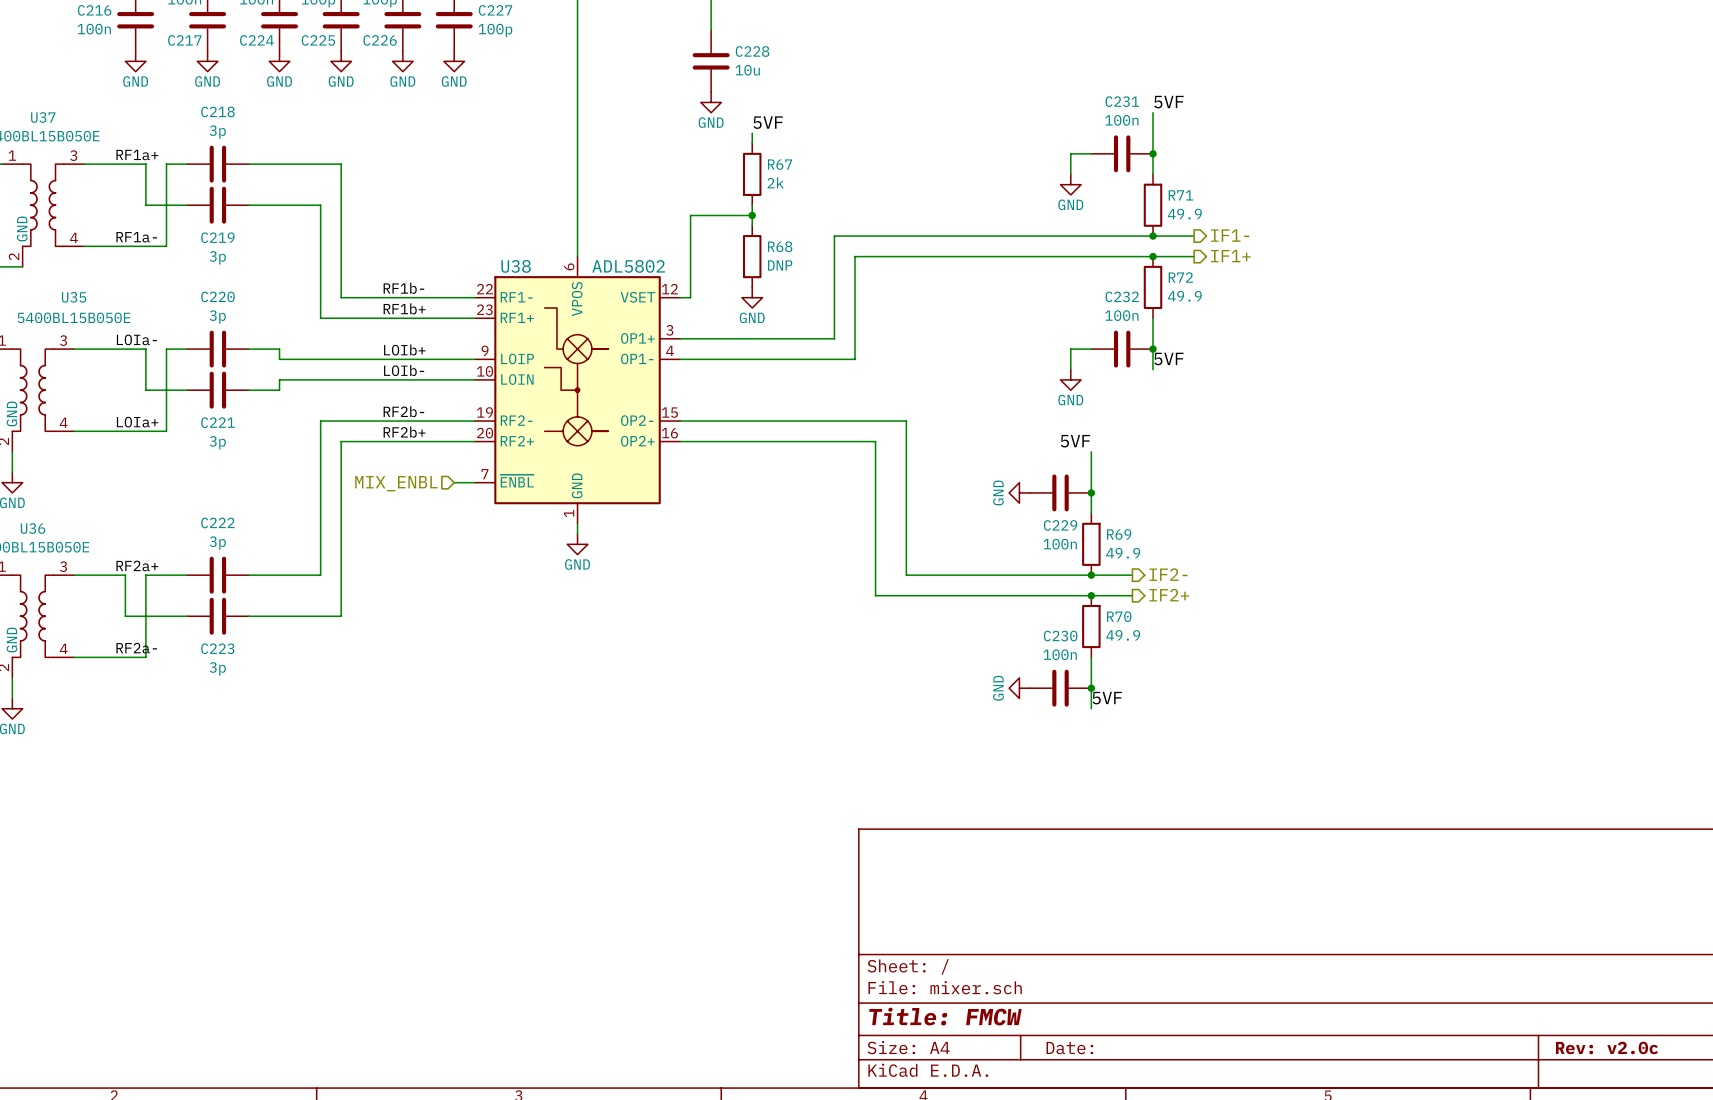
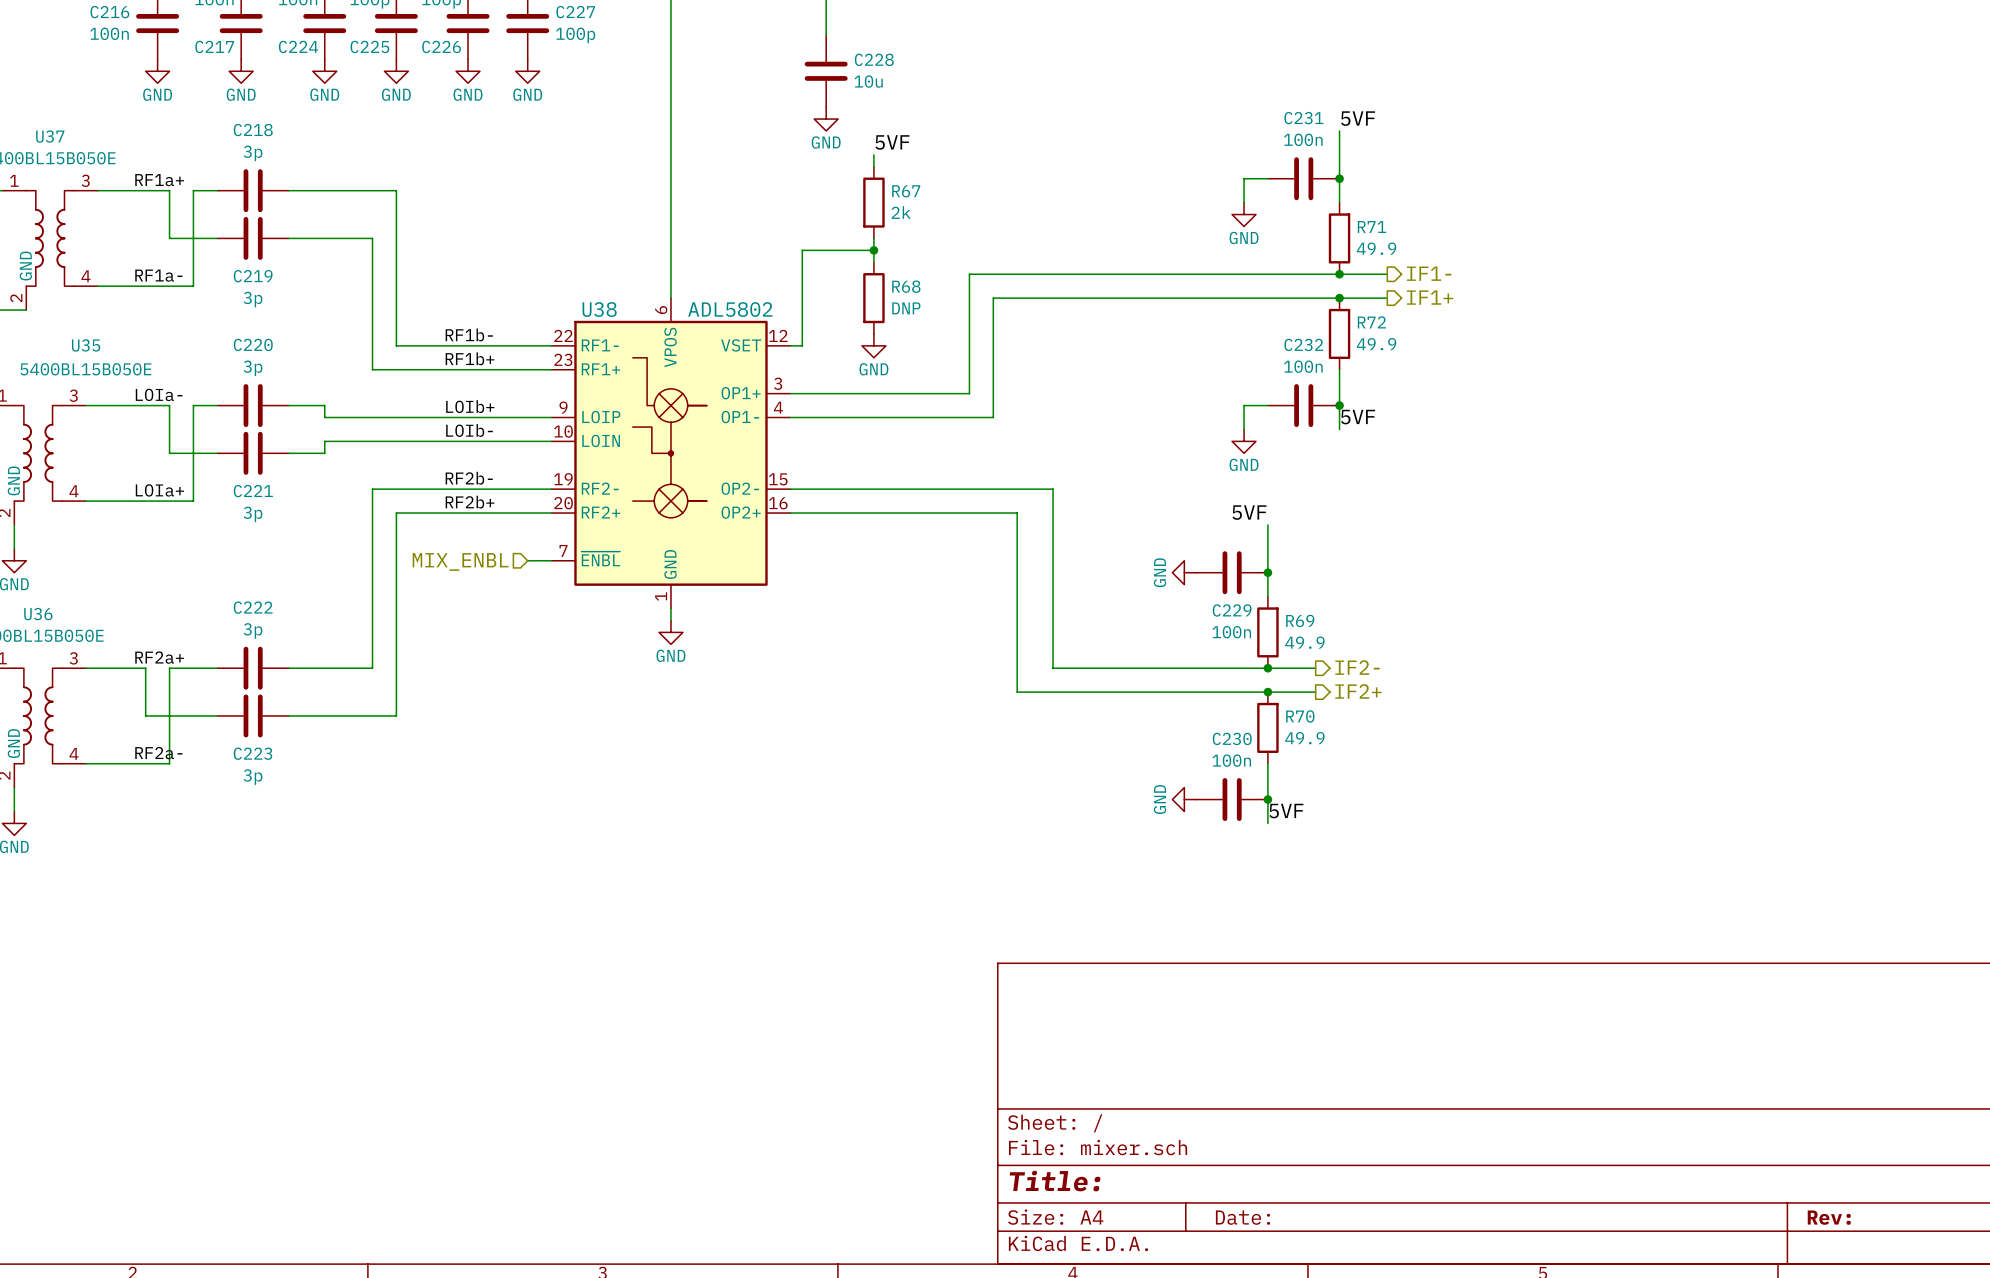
title block: Title: FMCW (945, 1016) -> Title: (1055, 1181)
title block: Rev: v2.0c (1607, 1047) -> Rev: (1829, 1217)

